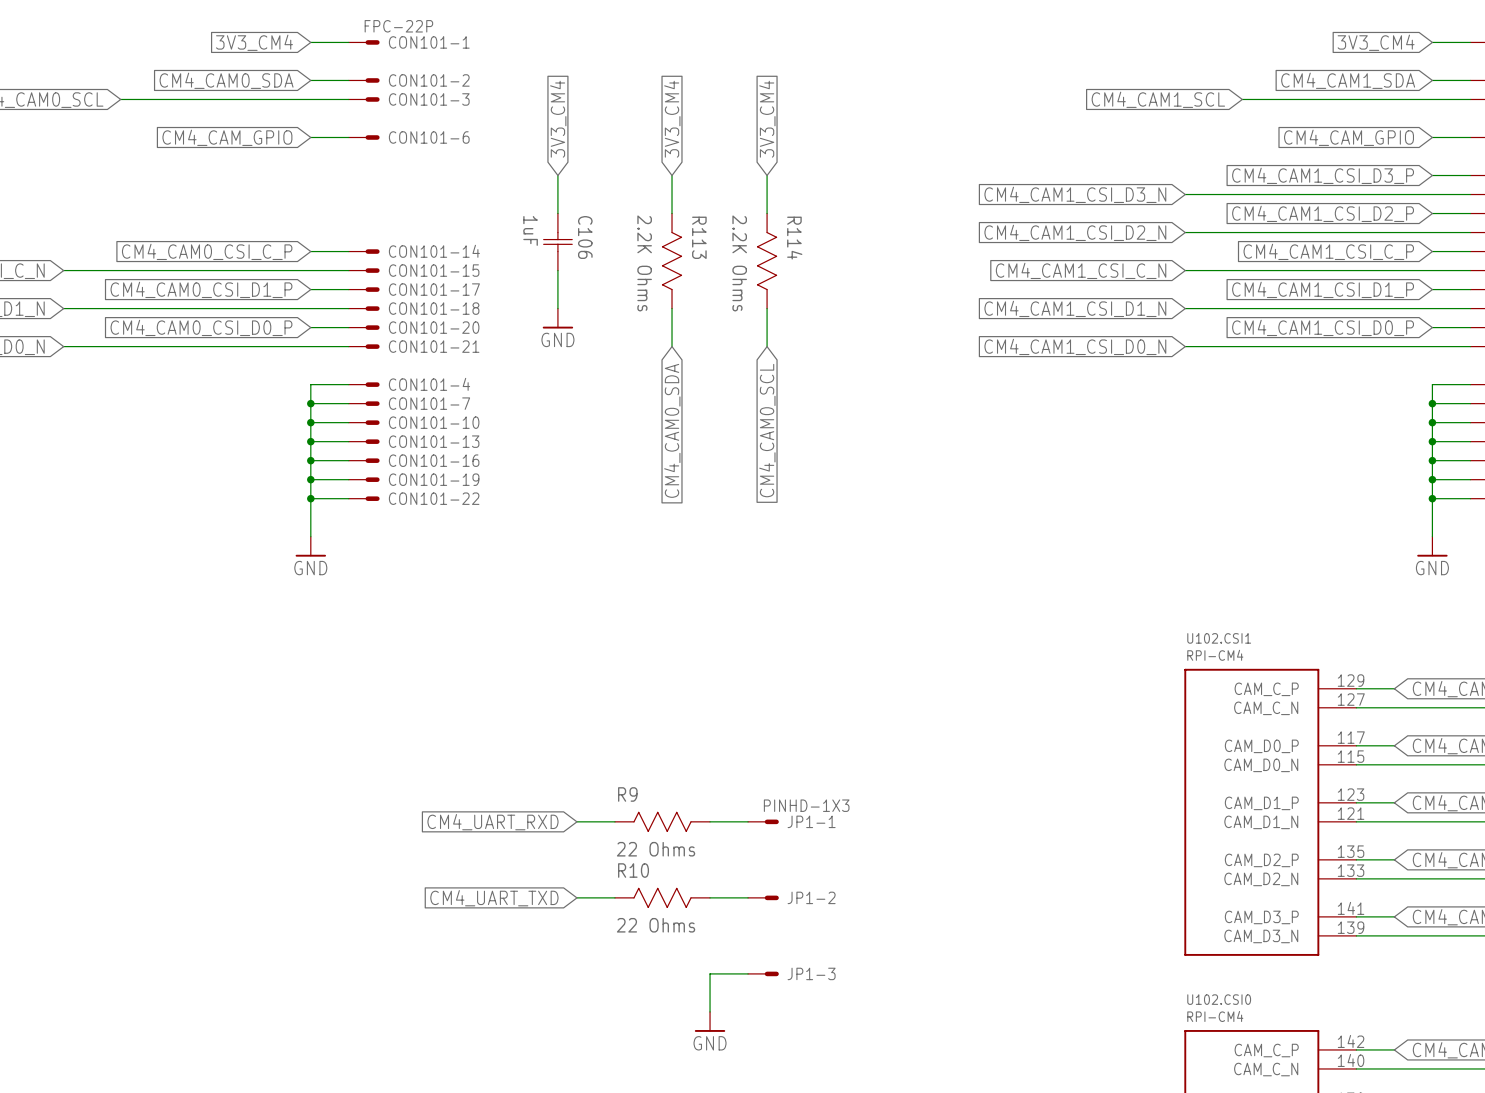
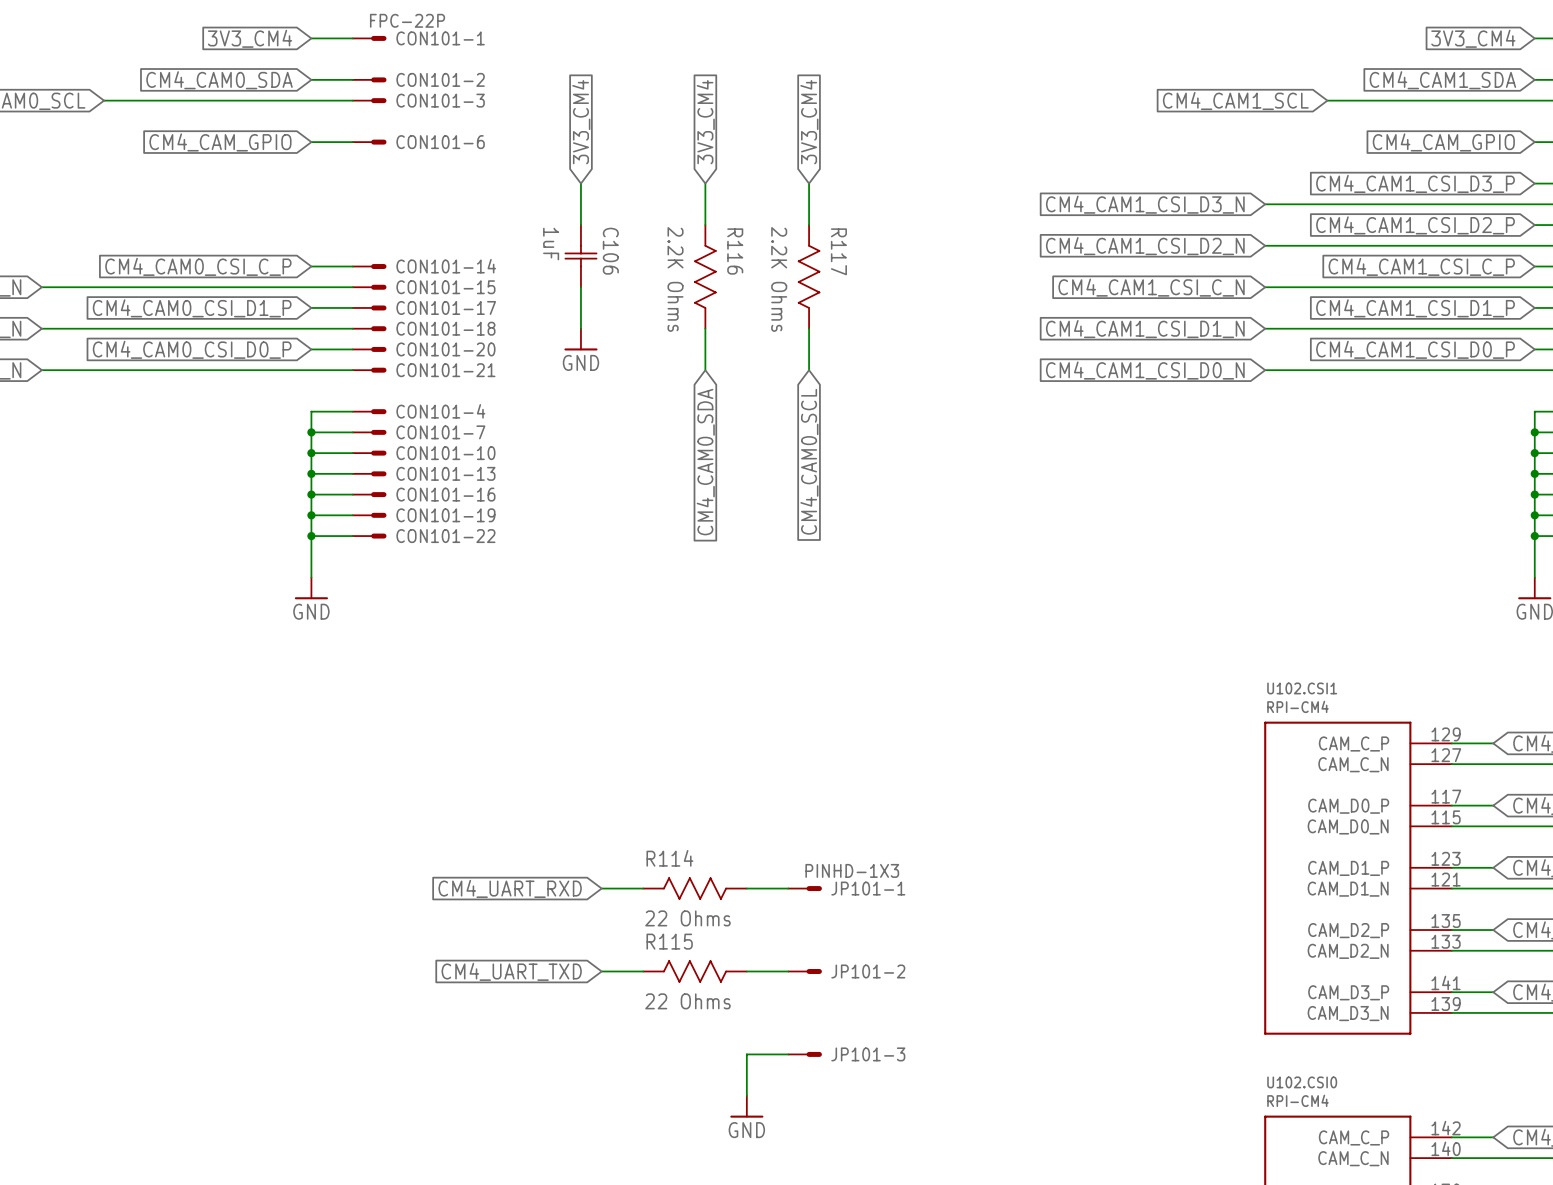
R113 name: R113 (699, 237) -> R116 (735, 251)
R114 name: R114 (794, 238) -> R117 (838, 251)
R9 name: R9 (627, 794) -> R114 (669, 858)
JP1-1 name: JP1-1 (811, 821) -> JP101-1 (868, 888)
R10 name: R10 (633, 870) -> R115 (669, 941)
JP1-2 name: JP1-2 (811, 897) -> JP101-2 (868, 971)
JP1-3 name: JP1-3 (811, 973) -> JP101-3 (868, 1054)

